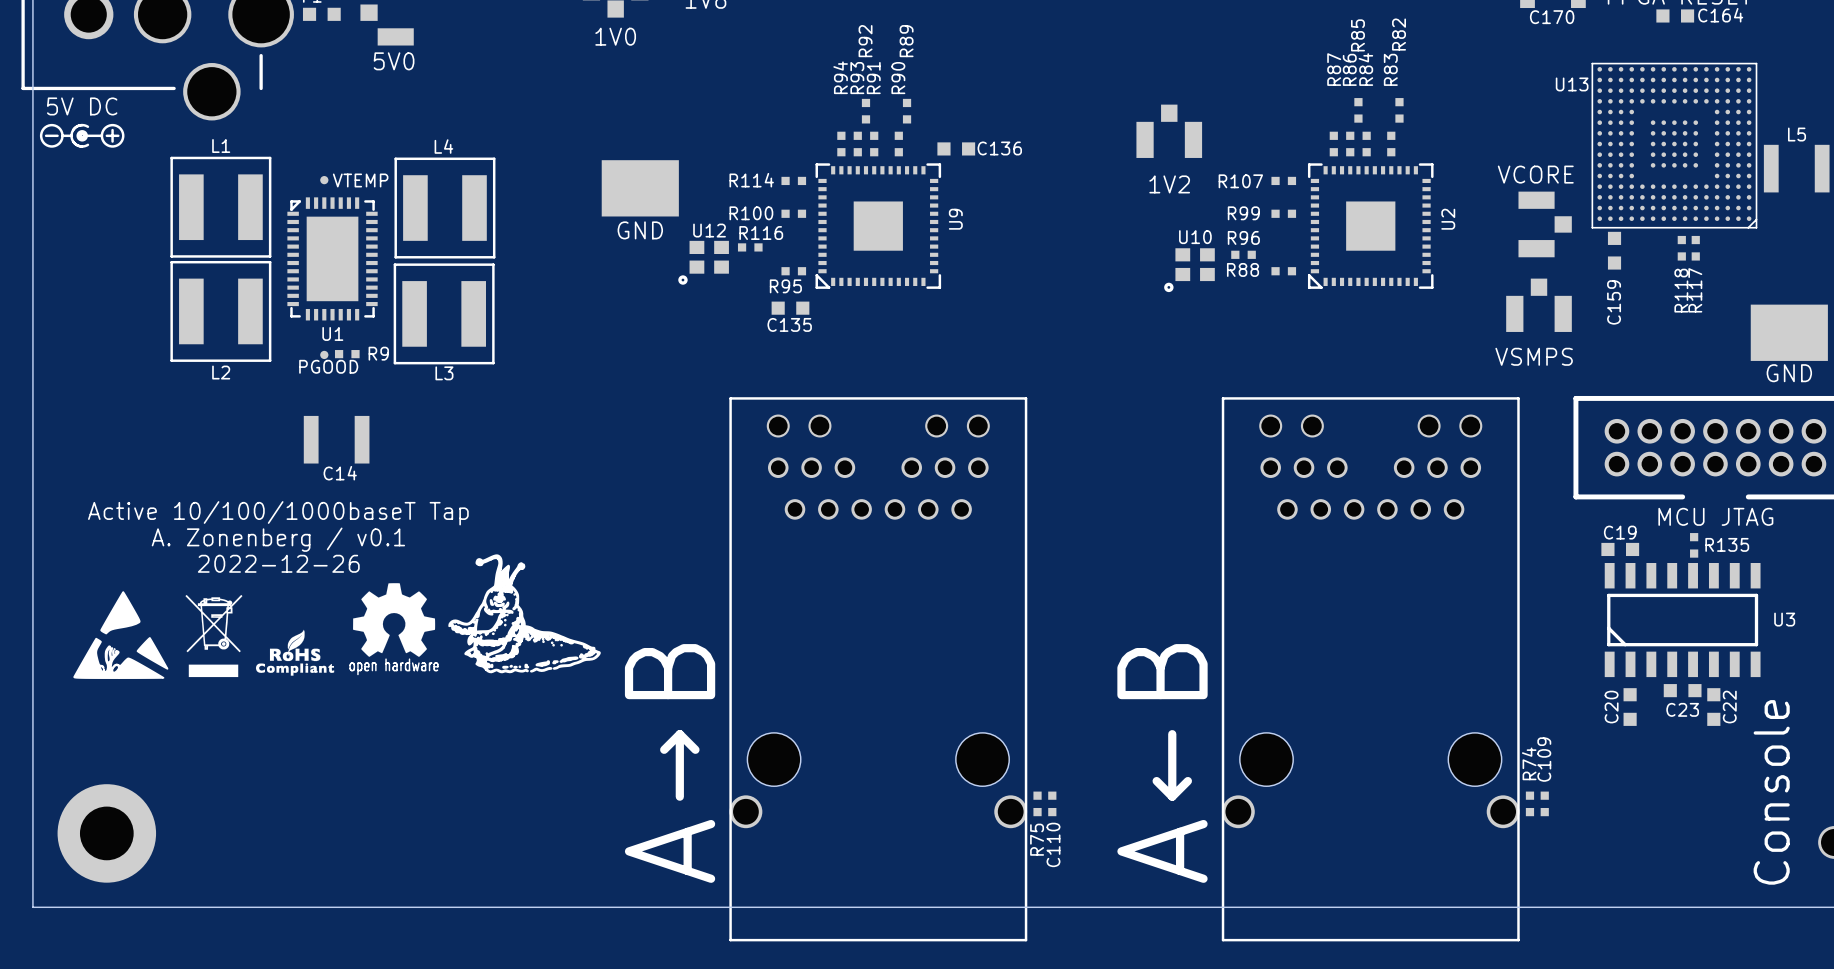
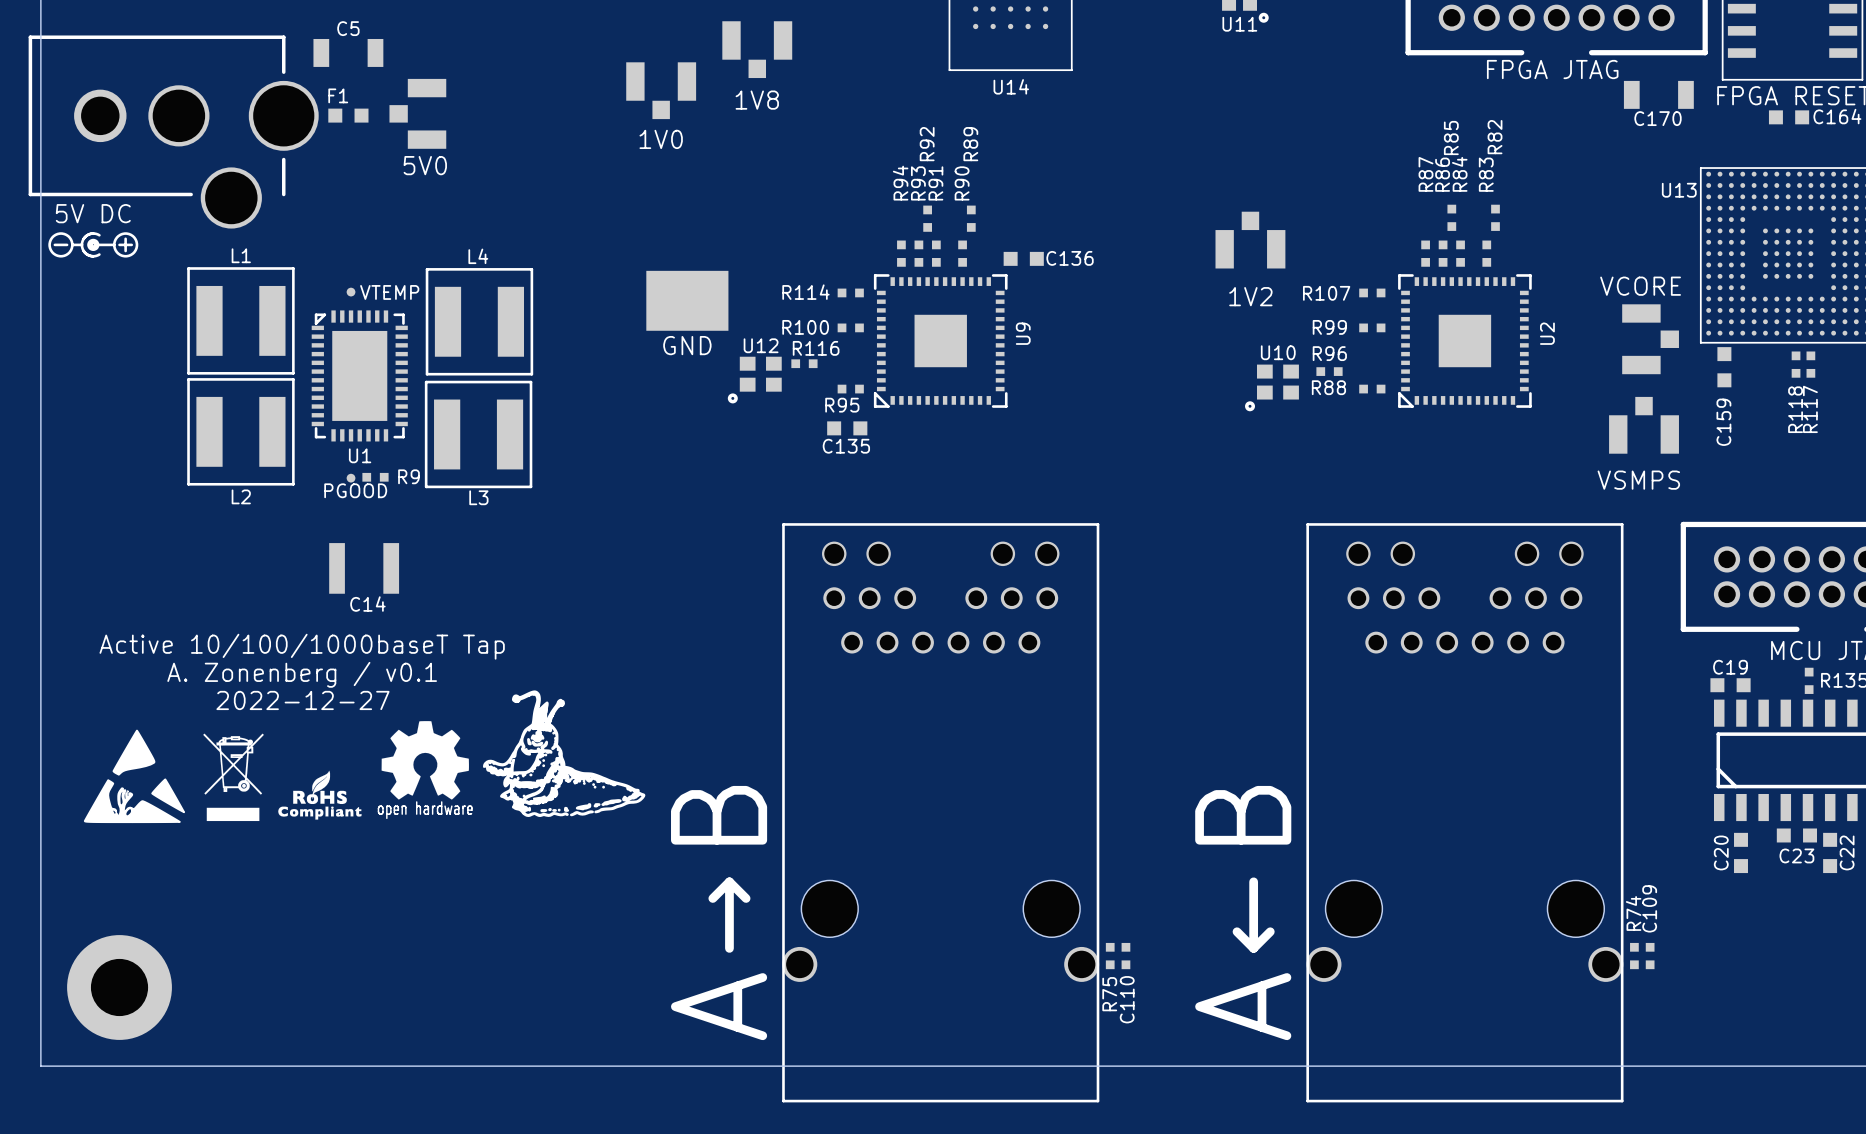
text: 2022-12-26 (278, 563) -> 2022-12-27 (302, 700)

